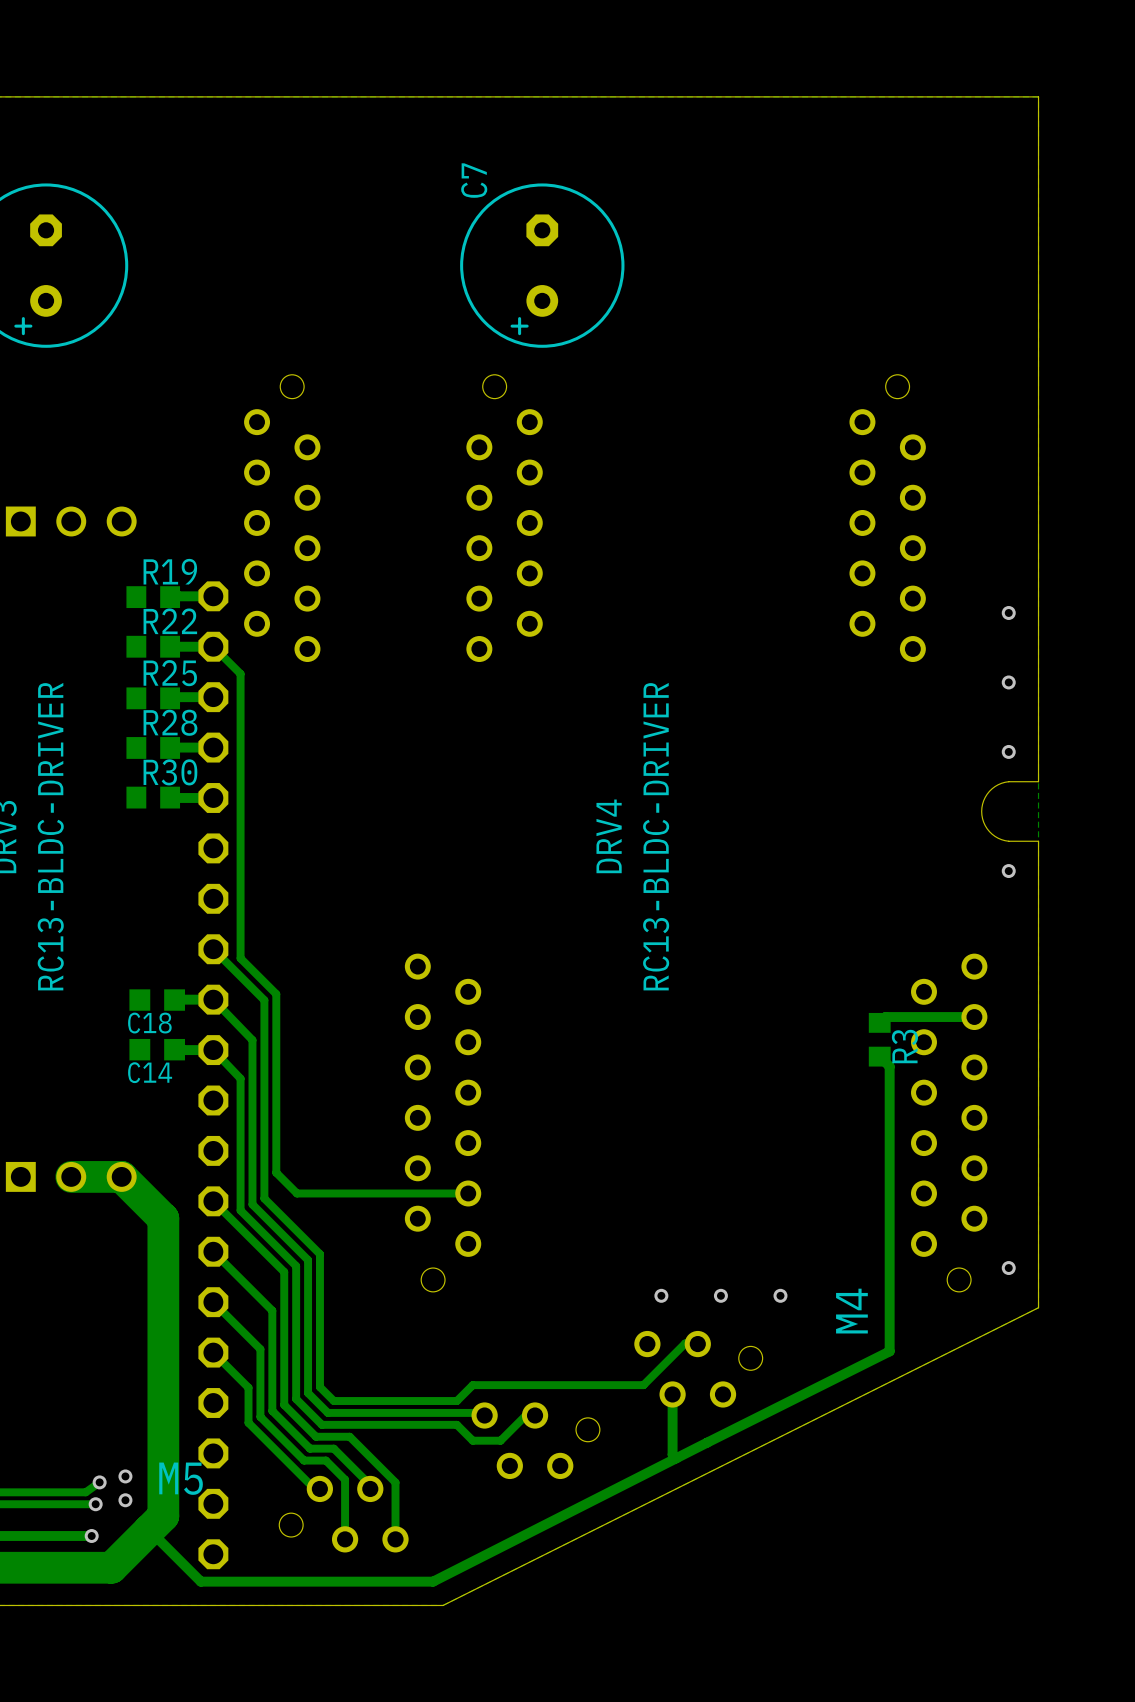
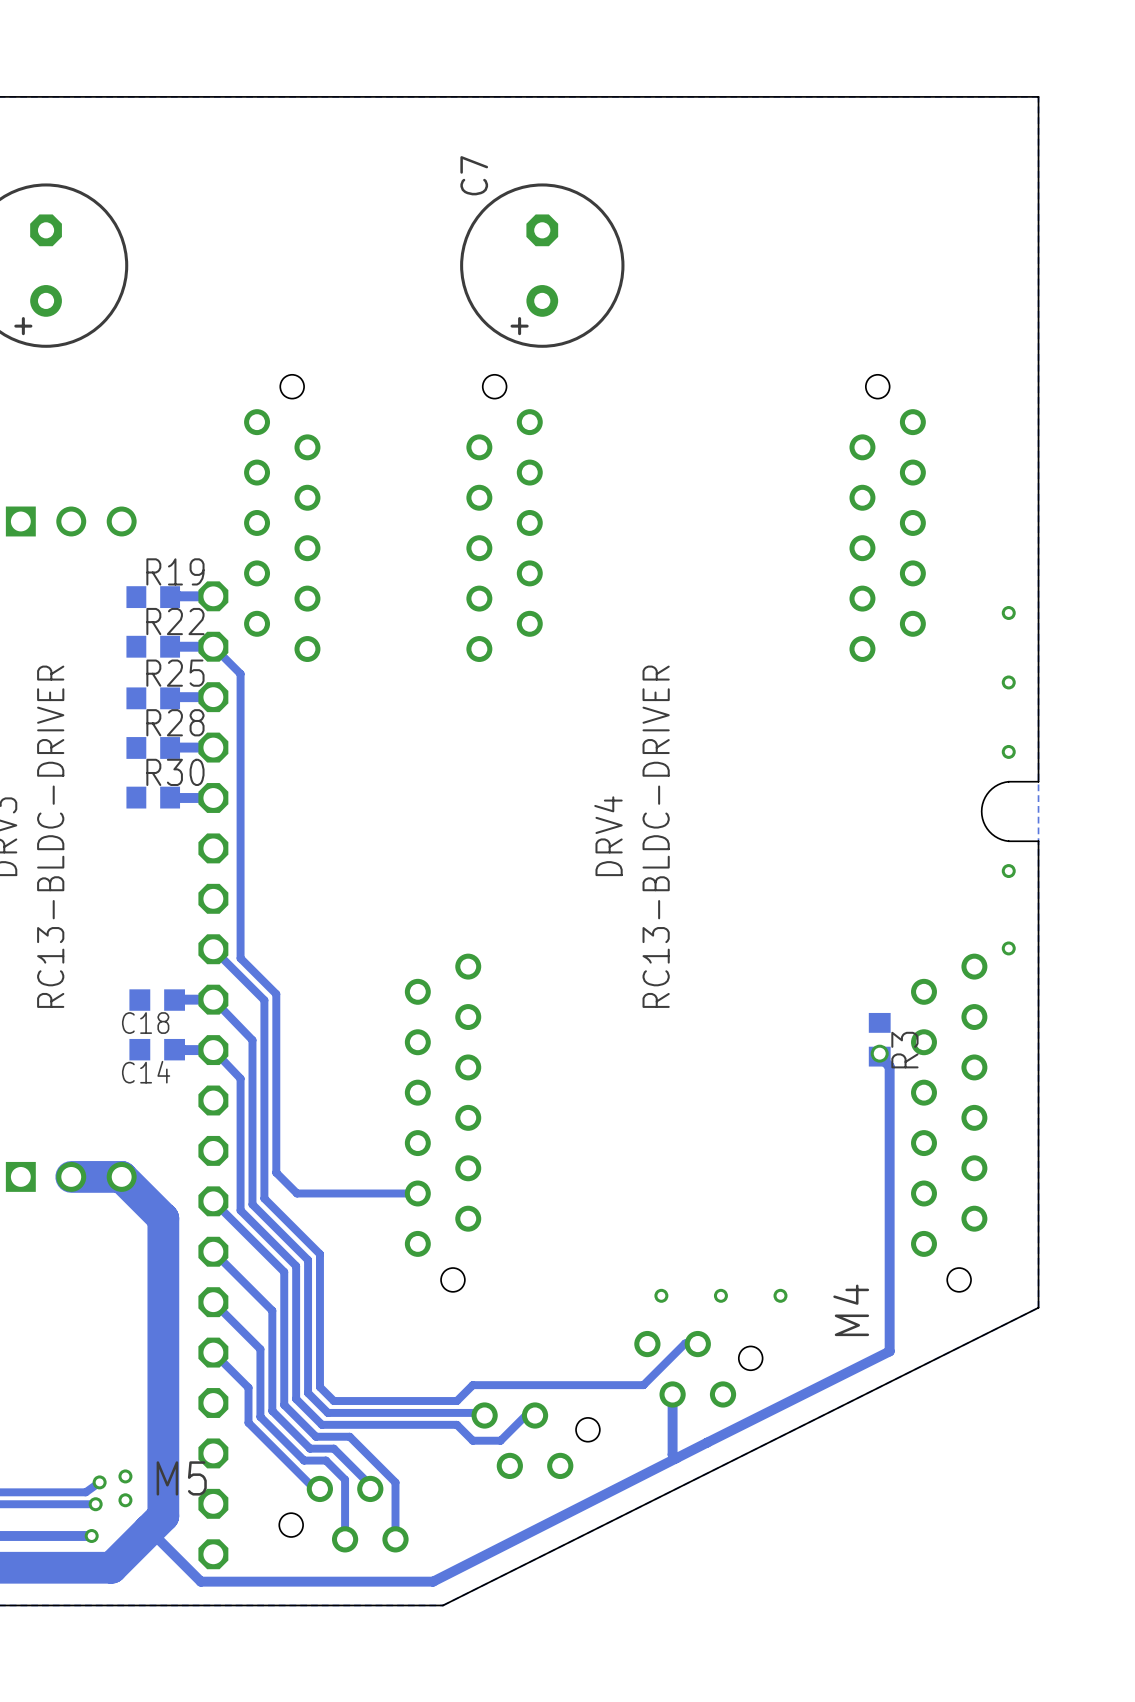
DRV4 footprint: [404, 374, 926, 1292] -> [404, 374, 926, 1292]
via: none -> (1008, 948)
track: (974, 1017) (885, 1017) (879, 1022) -> none
via: none -> (879, 1053)
track: (468, 1193) (417, 1193) -> none
via: (1008, 1268) -> none

